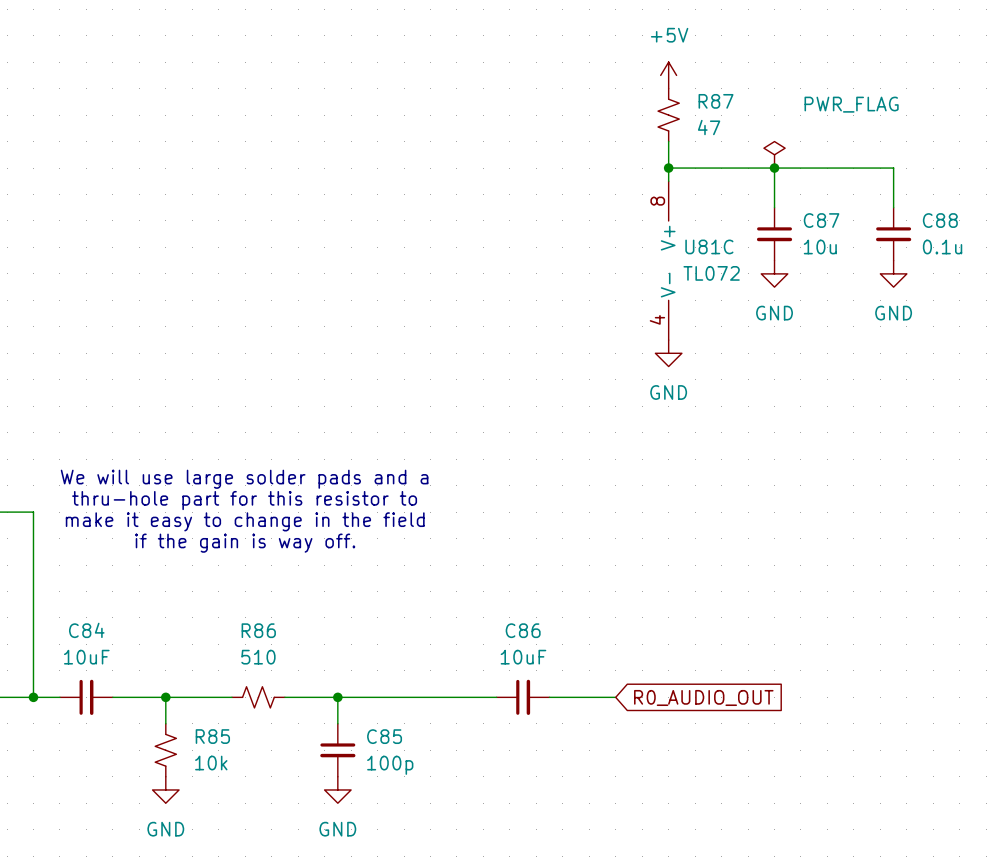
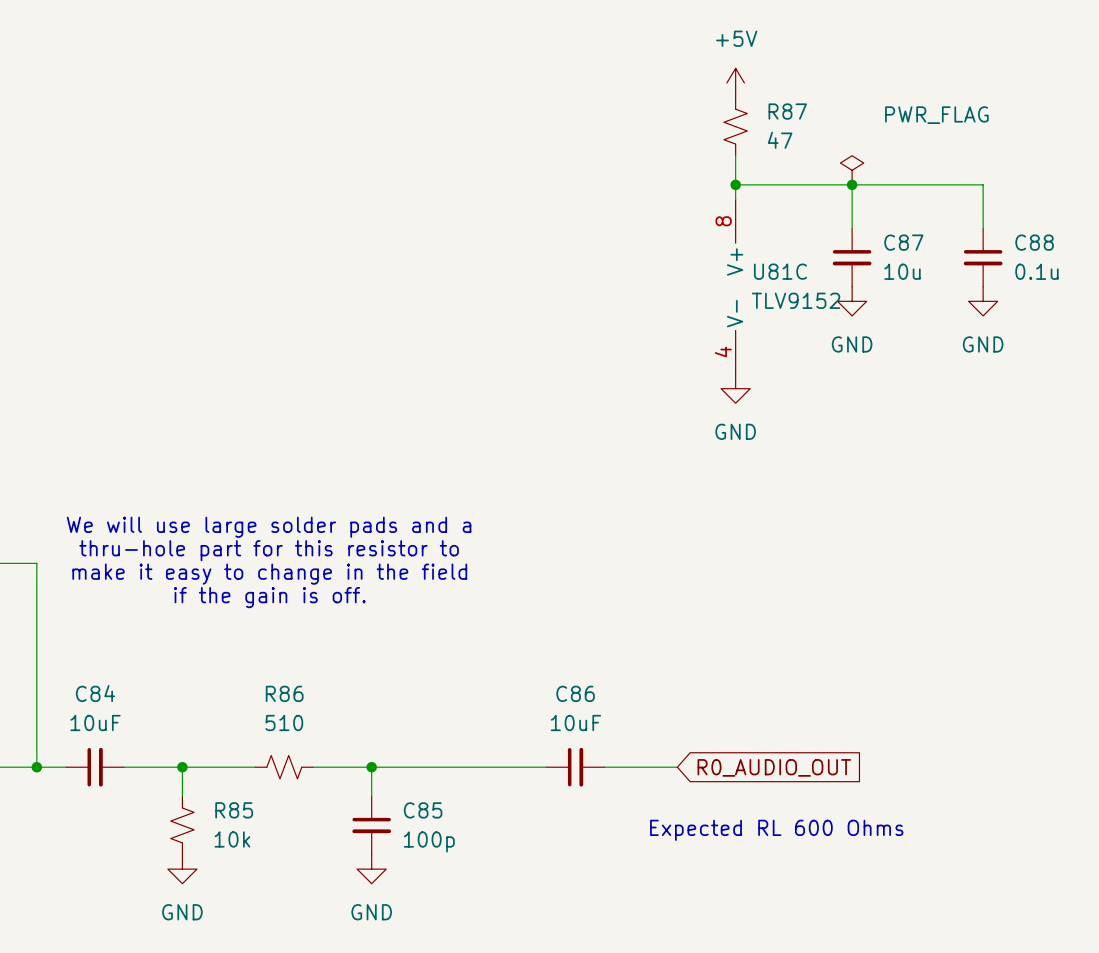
U81C value: TL072 (711, 273) -> TLV9152 (796, 300)
text: if the gain is way off. (245, 543) -> if the gain is off. (269, 597)
text: none -> Expected RL 600 Ohms (776, 830)

